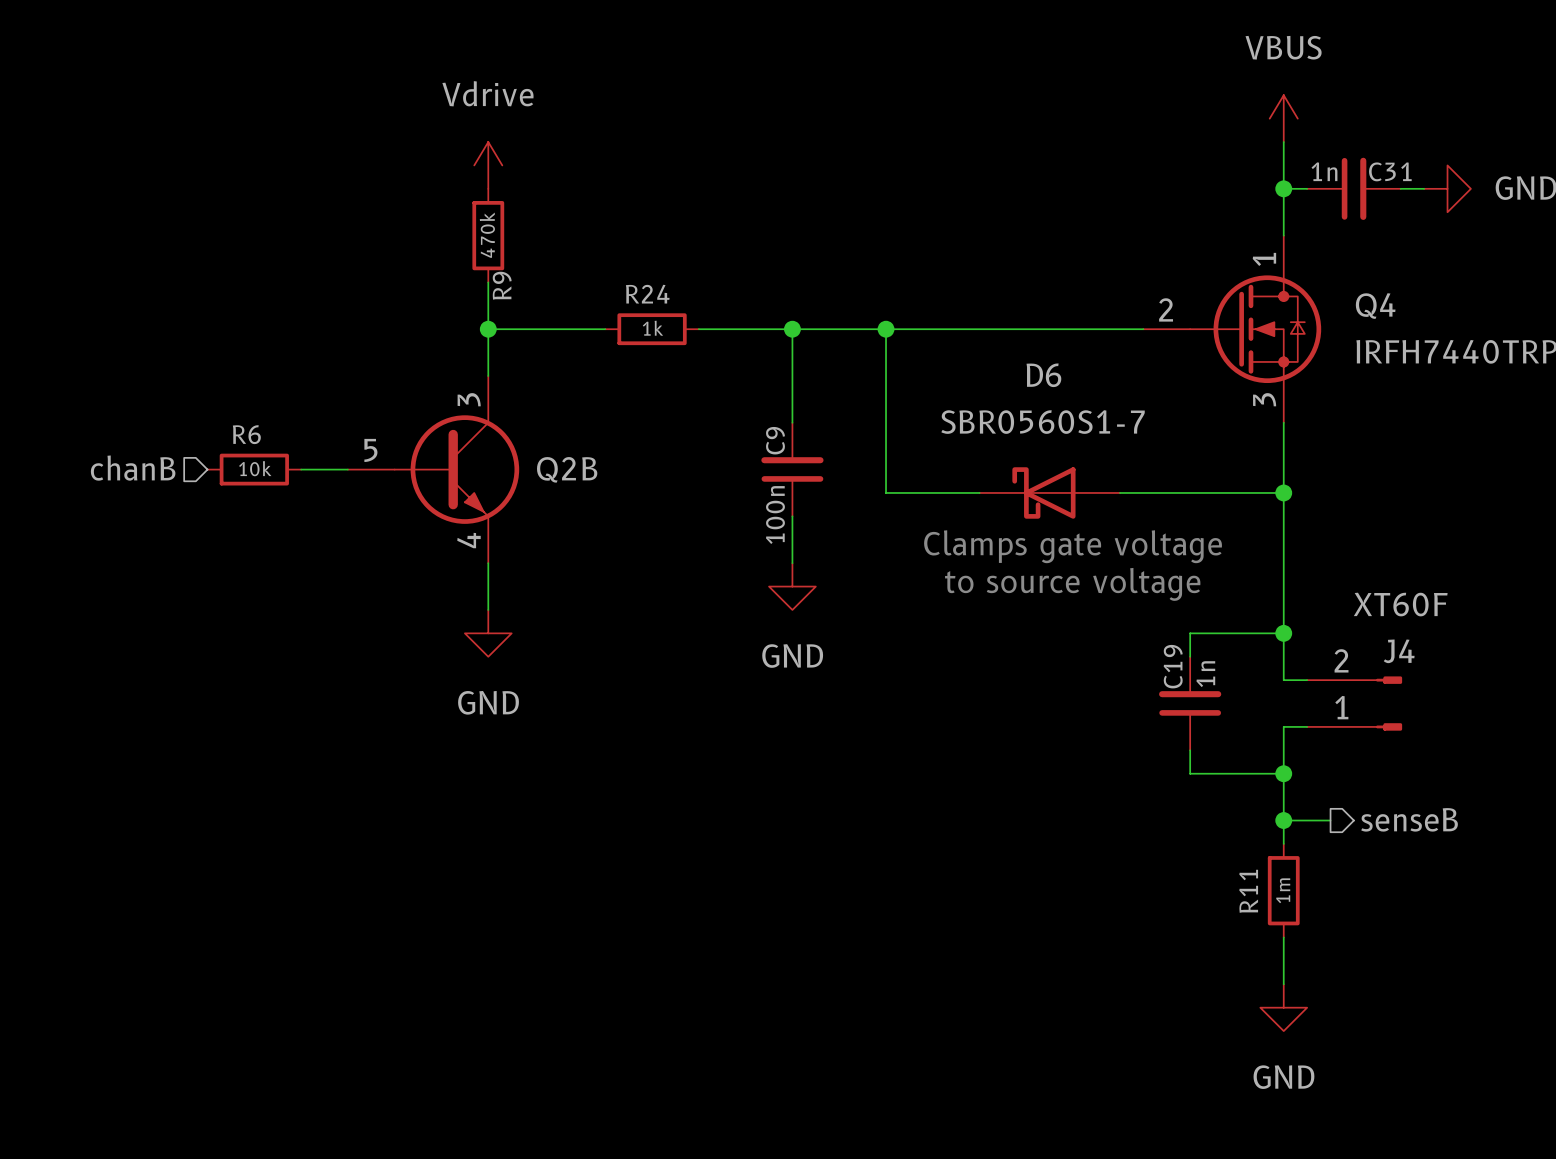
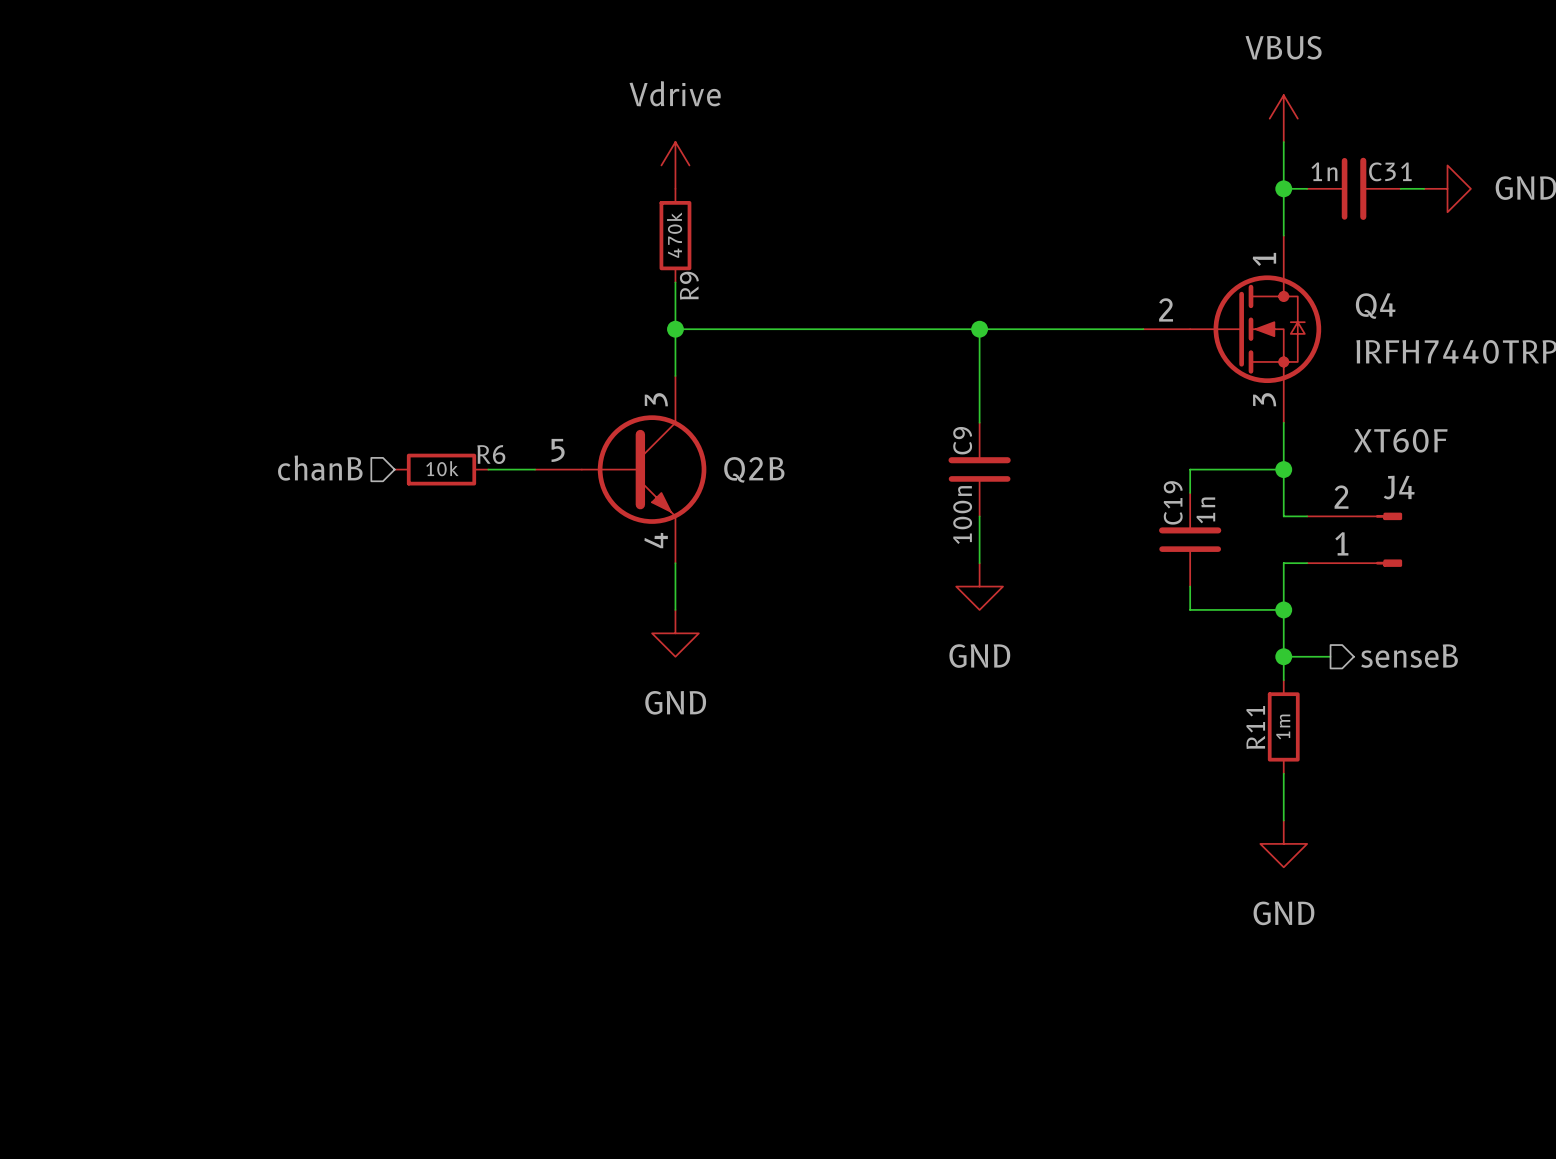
power symbol position: Vdrive (488, 165) -> Vdrive (675, 165)
R9 position: (488, 235) -> (675, 235)
wire: (488, 282) (488, 376) -> (675, 282) (675, 376)
wire: (488, 329) (605, 329) -> none
junction: (488, 329) -> none
R24: 1k (652, 329) -> none
junction: none -> (675, 329)
wire: (792, 329) (792, 422) -> (979, 329) (979, 422)
junction: (792, 329) -> none
wire: (886, 329) (886, 492) (979, 492) -> none
junction: (886, 329) -> none
junction: none -> (979, 329)
R6 name position: R6 (246, 434) -> R6 (491, 454)
hierarchical label position: chanB (133, 468) -> chanB (320, 468)
R6 position: (254, 469) -> (441, 469)
wire: (301, 469) (347, 469) -> (488, 469) (535, 469)
Q2B position: (433, 469) -> (620, 469)
C9 position: (792, 469) -> (979, 469)
D6: SBR0560S1-7 (1049, 492) -> none
wire: (1119, 492) (1283, 492) -> none
junction position: (1283, 492) -> (1283, 469)
wire: (792, 516) (792, 563) -> (979, 516) (979, 563)
wire: (1283, 516) (1283, 563) -> (1283, 516) (1307, 516)
text: Clamps gate voltage (1073, 546) -> none
wire: (488, 563) (488, 609) -> (675, 563) (675, 609)
text: to source voltage (1072, 584) -> none
power symbol: GND (792, 586) -> none
power symbol: none -> GND (979, 586)
wire: none -> (1190, 586) (1190, 609) (1283, 609)
junction: none -> (1283, 609)
power symbol: GND (488, 633) -> none
power symbol: none -> GND (675, 633)
wire: (1283, 633) (1190, 633) (1190, 656) -> (1283, 469) (1190, 469) (1190, 492)
junction: (1283, 633) -> none
wire: none -> (1283, 656) (1330, 656)
junction: none -> (1283, 656)
wire: (1283, 680) (1307, 680) -> (1283, 563) (1307, 563)
C19 position: (1190, 703) -> (1190, 539)
J4 position: (1354, 703) -> (1354, 539)
wire: (1307, 726) (1283, 726) (1283, 773) (1190, 773) (1190, 750) -> none
junction: (1283, 773) -> none
hierarchical label position: senseB (1409, 819) -> senseB (1409, 656)
junction: (1283, 820) -> none
wire: (1330, 820) (1283, 820) (1283, 843) -> none
R11 position: (1283, 890) -> (1283, 726)
R11 name position: R11 (1248, 891) -> R11 (1255, 727)
wire: (1283, 937) (1283, 984) -> none
power symbol position: GND (1283, 1007) -> GND (1283, 843)

